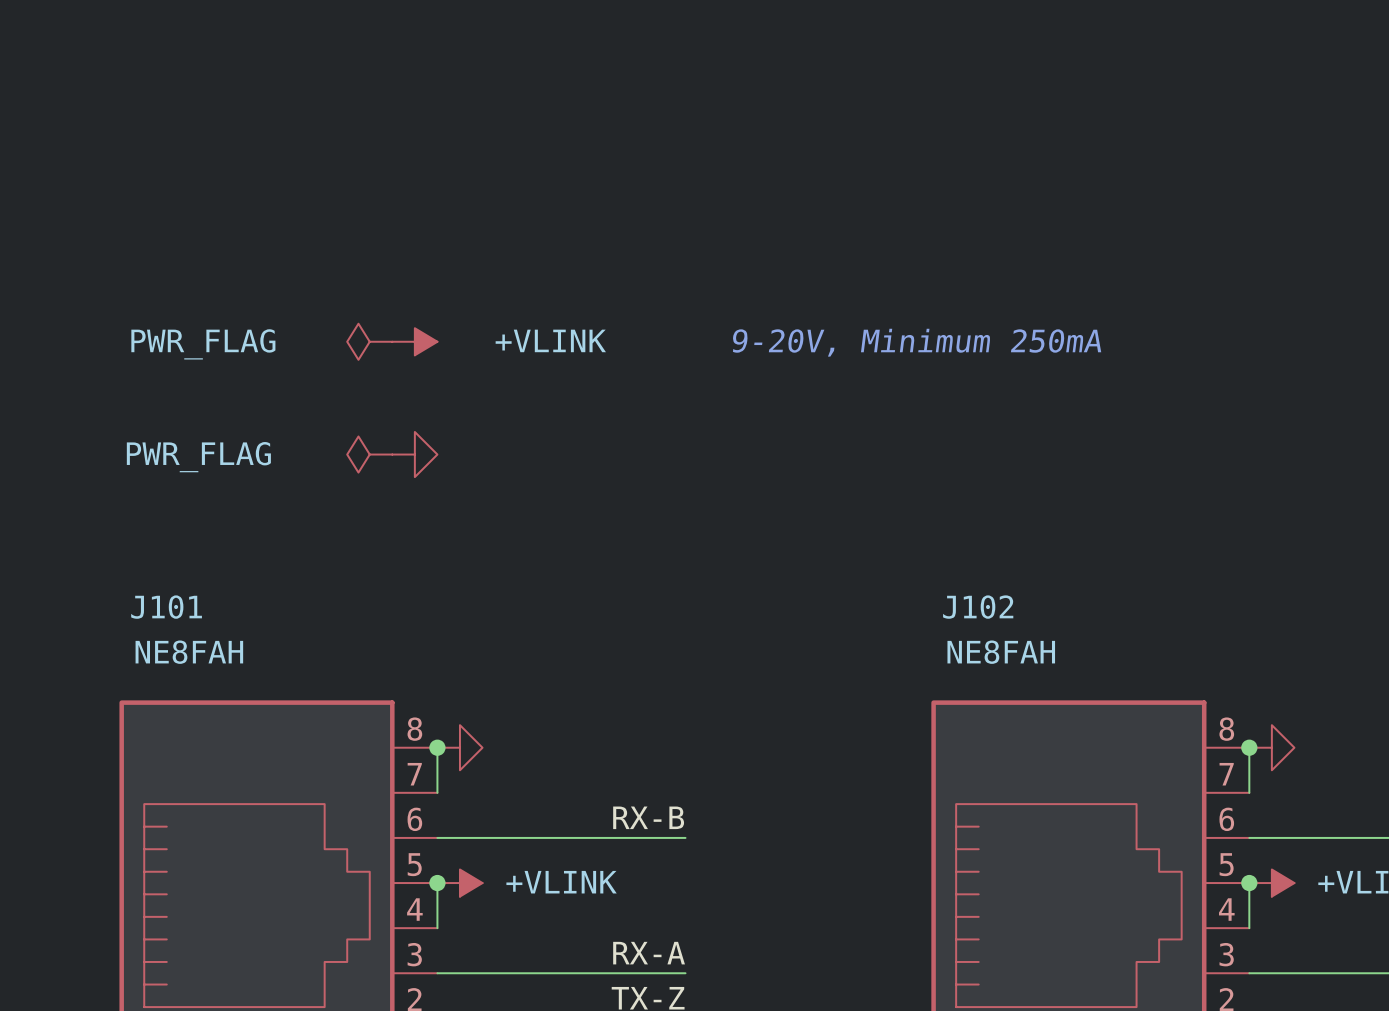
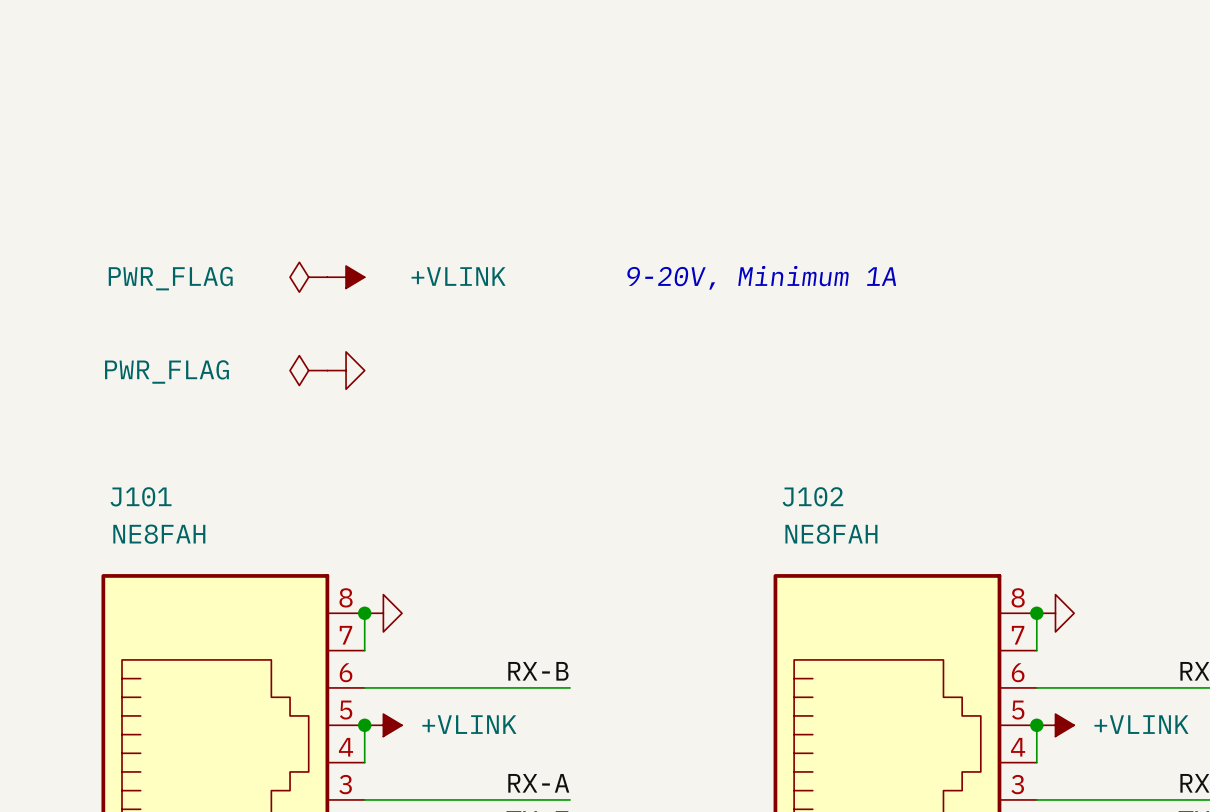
text: 9-20V, Minimum 250mA (916, 342) -> 9-20V, Minimum 1A (761, 277)

